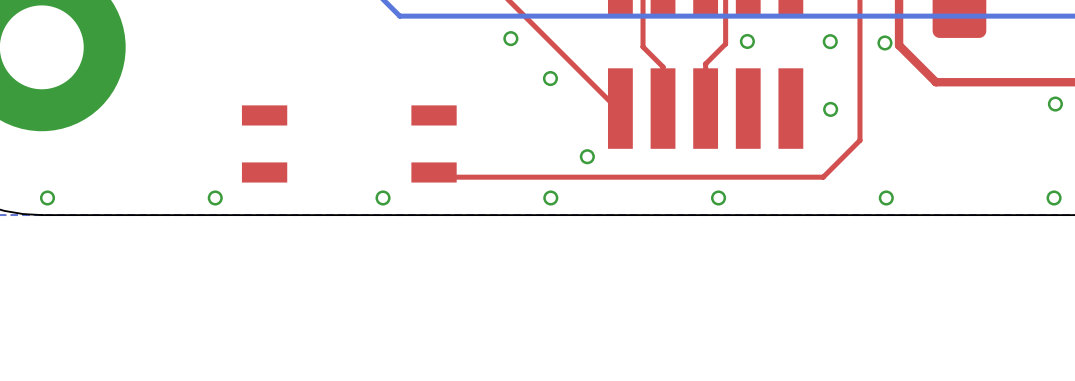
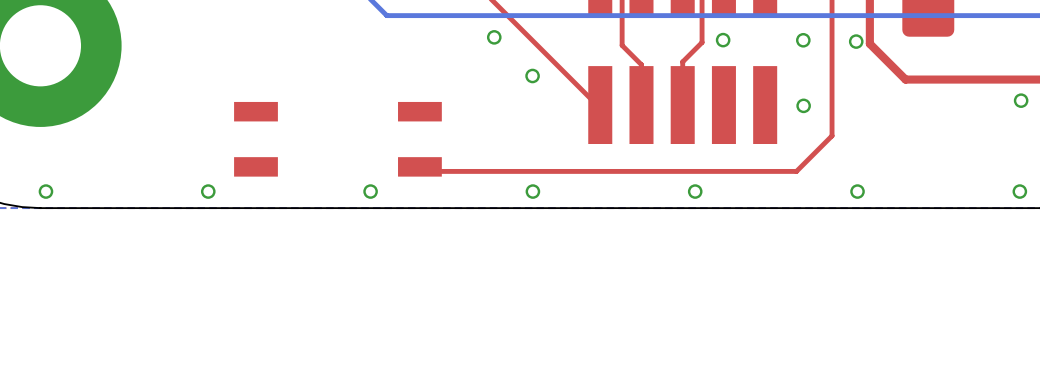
via: (587, 156) -> none

